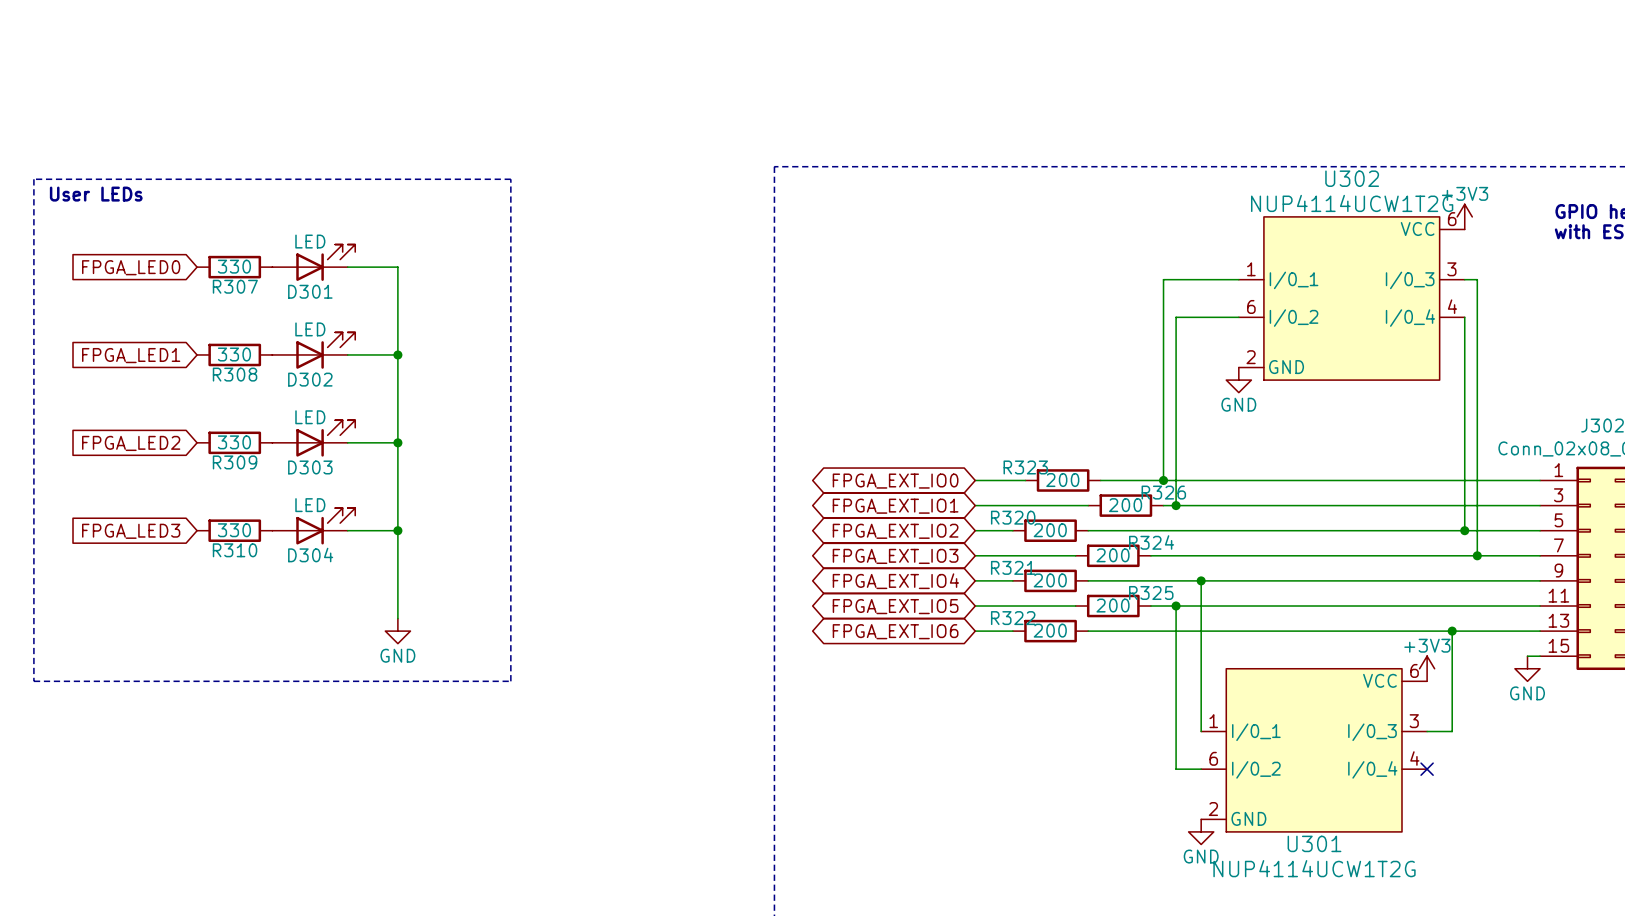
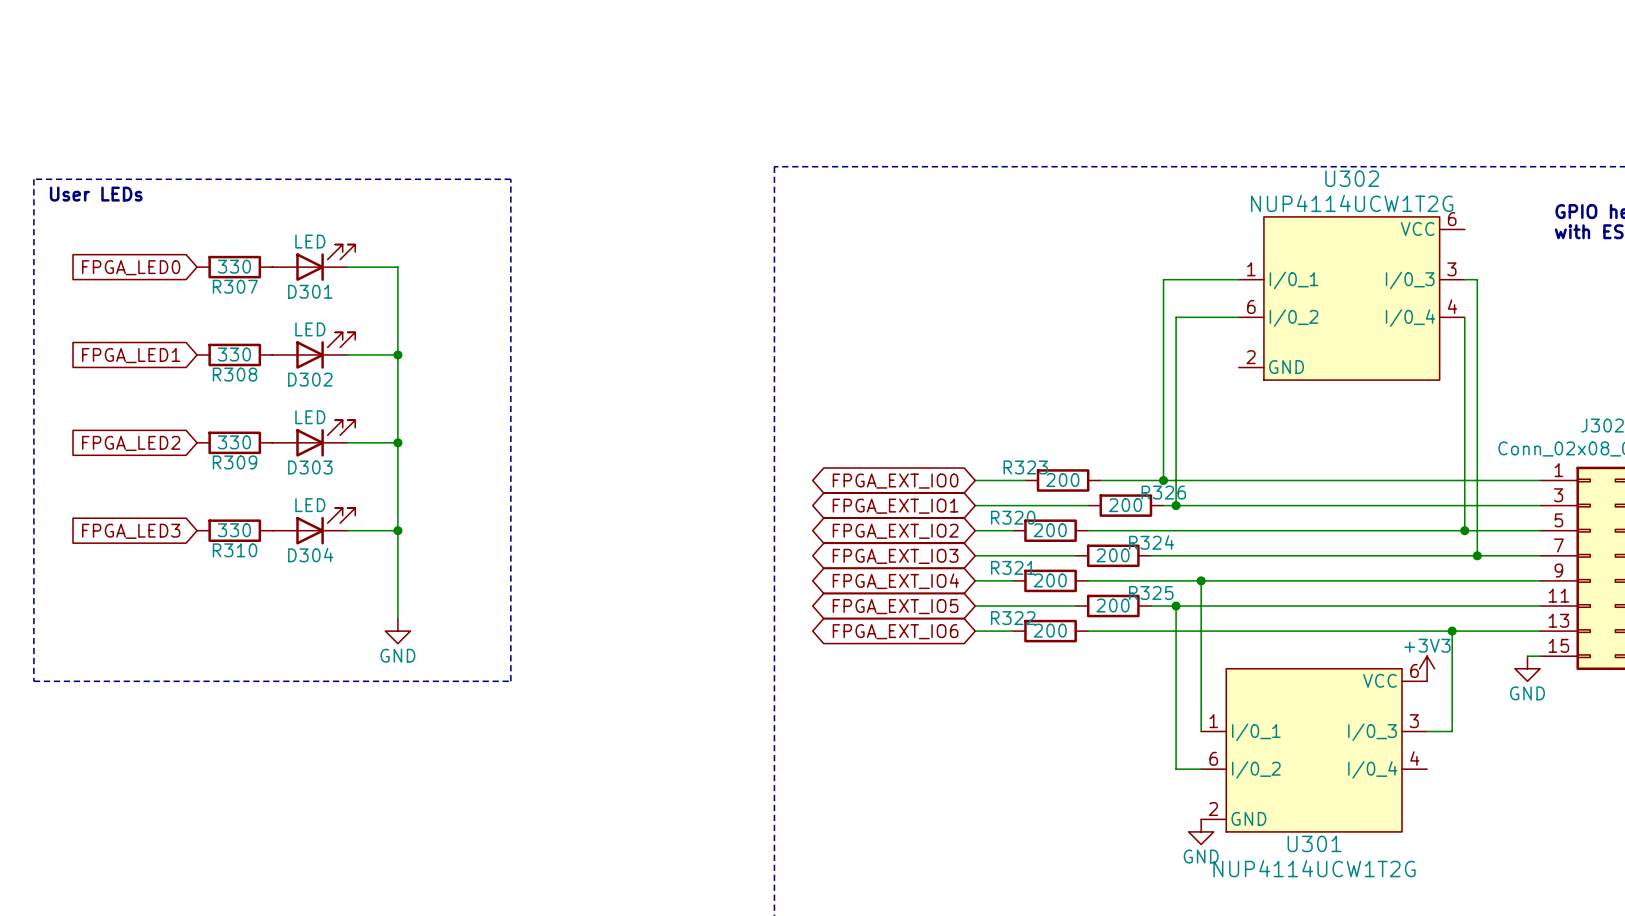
power symbol: +3V3 (1464, 216) -> none
power symbol: GND (1238, 380) -> none
no-connect mark: (1427, 769) -> none

